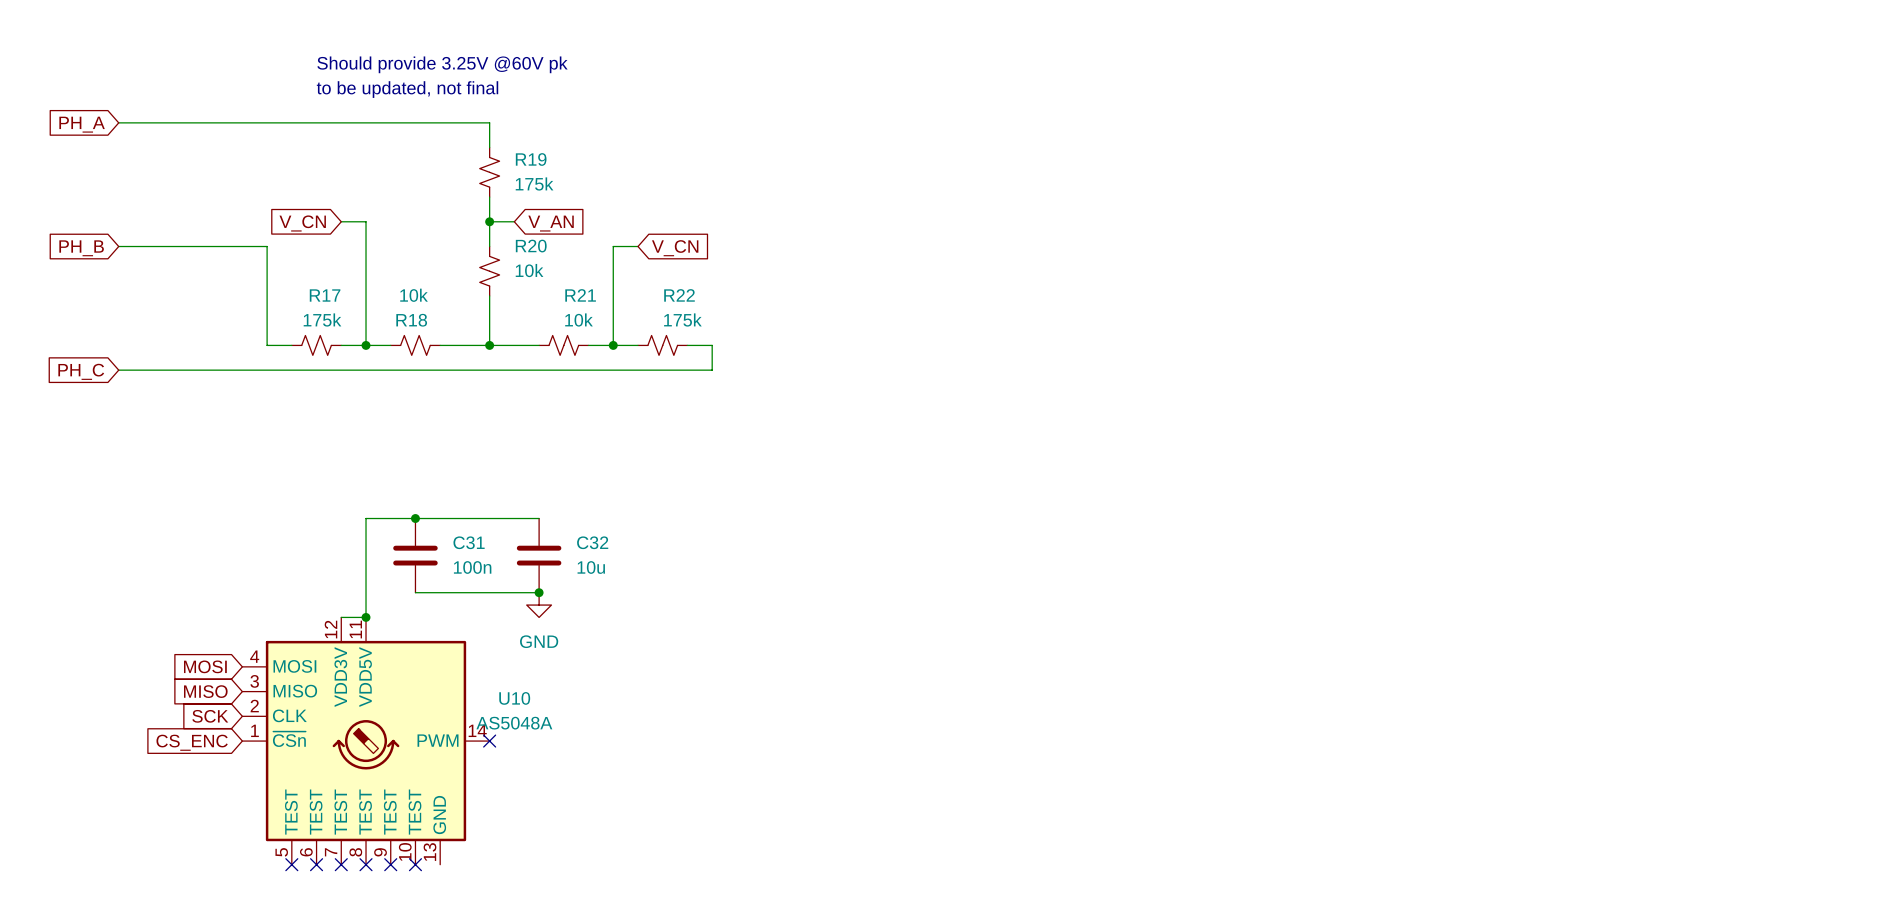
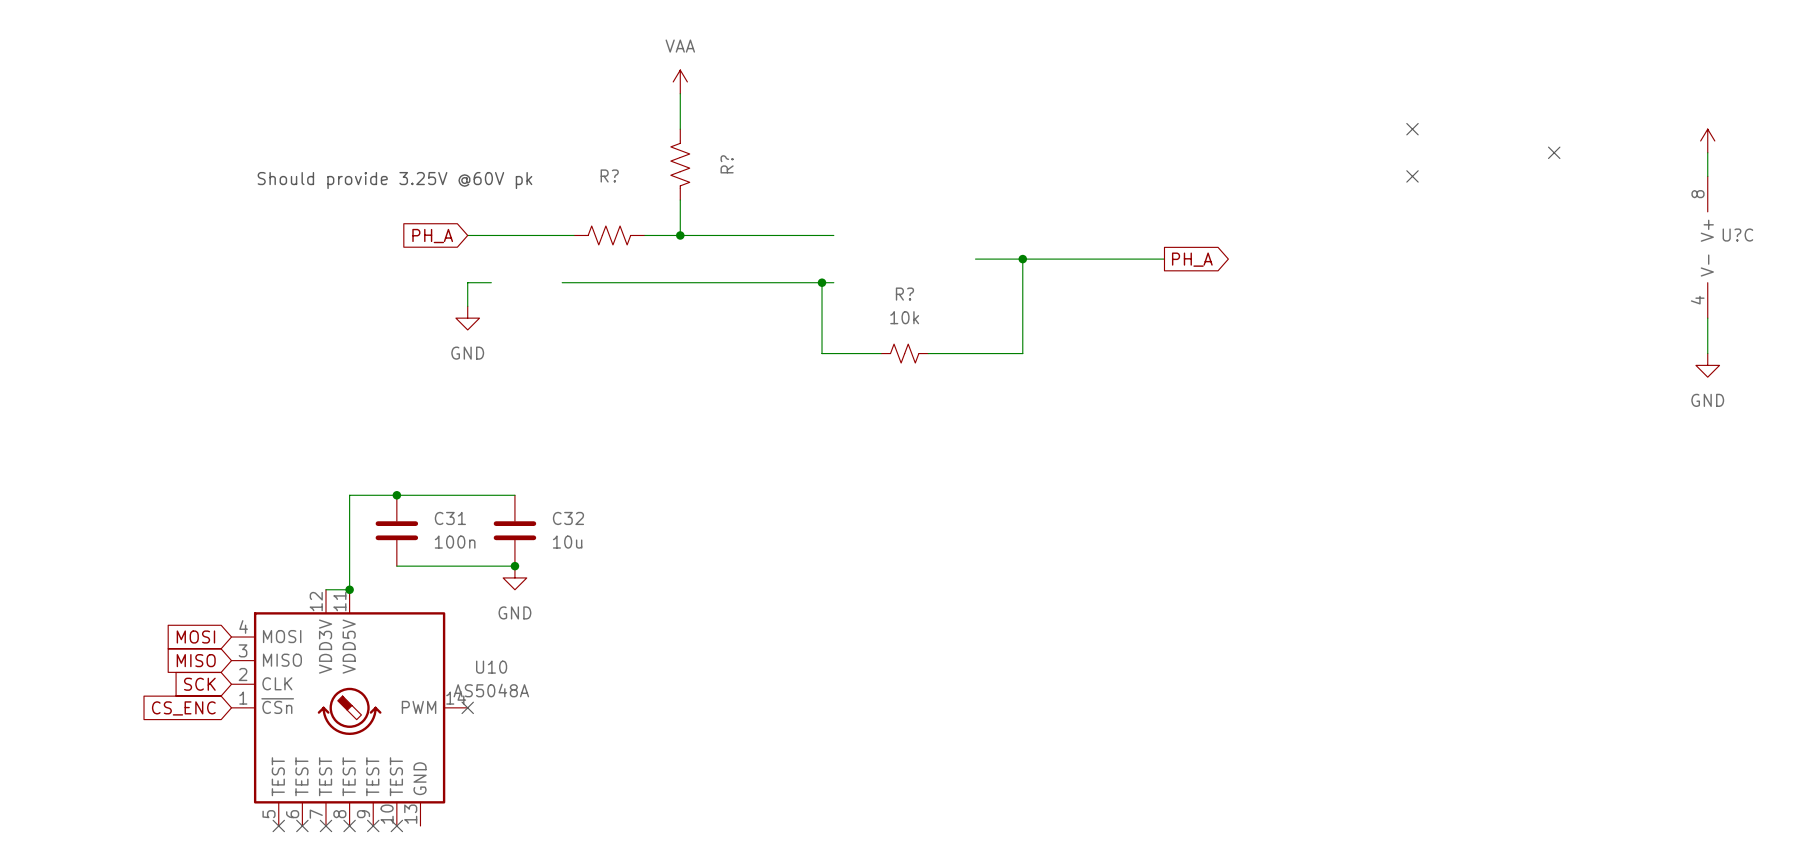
text position: Should provide 3.25V @60V pk (442, 64) -> Should provide 3.25V @60V pk (394, 180)
power symbol: none -> VAA (680, 81)
text: to be updated, not final (407, 89) -> none
wire: none -> (680, 93) (680, 129)
wire: (118, 122) (489, 122) (489, 147) -> none
global label: PH_A (82, 124) -> none
no-connect mark: none -> (1412, 129)
power symbol: none -> (1707, 140)
no-connect mark: none -> (1554, 152)
wire: none -> (1707, 152) (1707, 176)
R19: 175k (489, 172) -> none
R?: none -> (680, 164)
no-connect mark: none -> (1412, 176)
wire: (489, 197) (489, 246) -> (574, 235) (467, 235)
wire: none -> (680, 200) (680, 235)
wire: (341, 221) (366, 221) (366, 345) -> none
wire: (489, 221) (514, 221) -> (467, 282) (491, 282)
junction: (489, 221) -> none
global label: V_CN (302, 223) -> none
global label: V_AN (551, 223) -> none
wire: (118, 246) (267, 246) (267, 345) (291, 345) -> none
wire: (638, 246) (613, 246) (613, 345) -> none
R?: none -> (609, 235)
wire: none -> (644, 235) (833, 235)
junction: none -> (680, 235)
global label: PH_B (81, 248) -> none
global label: none -> PH_A (432, 236)
global label: V_CN (675, 248) -> none
U?C: none -> (1707, 247)
R20: 10k (489, 271) -> none
wire: none -> (975, 259) (1164, 259)
wire: none -> (1022, 259) (1022, 353) (928, 353)
junction: none -> (1022, 259)
global label: none -> PH_A (1192, 259)
wire: none -> (562, 282) (833, 282)
wire: none -> (822, 282) (822, 353) (881, 353)
junction: none -> (822, 282)
power symbol: none -> GND (467, 318)
wire: none -> (1707, 318) (1707, 353)
R17: 175k (316, 345) -> none
wire: (341, 345) (390, 345) -> none
junction: (366, 345) -> none
R18: 10k (415, 345) -> none
wire: (440, 345) (539, 345) -> none
junction: (489, 345) -> none
R21: 10k (563, 345) -> none
wire: (588, 345) (638, 345) -> none
junction: (613, 345) -> none
R22: 175k (662, 345) -> none
wire: (687, 345) (712, 345) (712, 370) (118, 370) -> none
R?: none -> 10k (904, 353)
global label: PH_C (81, 371) -> none
power symbol: none -> GND (1707, 365)

